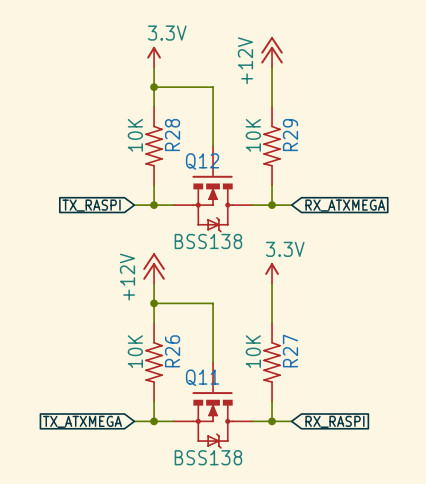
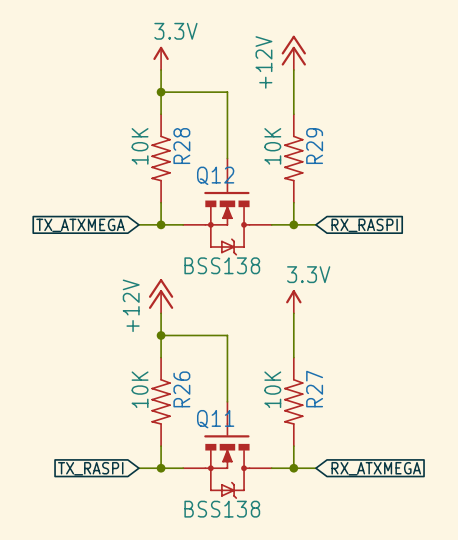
global label: TX_RASPI (91, 205) -> TX_ATXMEGA (80, 225)
global label: RX_ATXMEGA (345, 205) -> RX_RASPI (364, 225)
global label: TX_ATXMEGA (82, 421) -> TX_RASPI (90, 468)
global label: RX_RASPI (334, 421) -> RX_ATXMEGA (376, 468)

